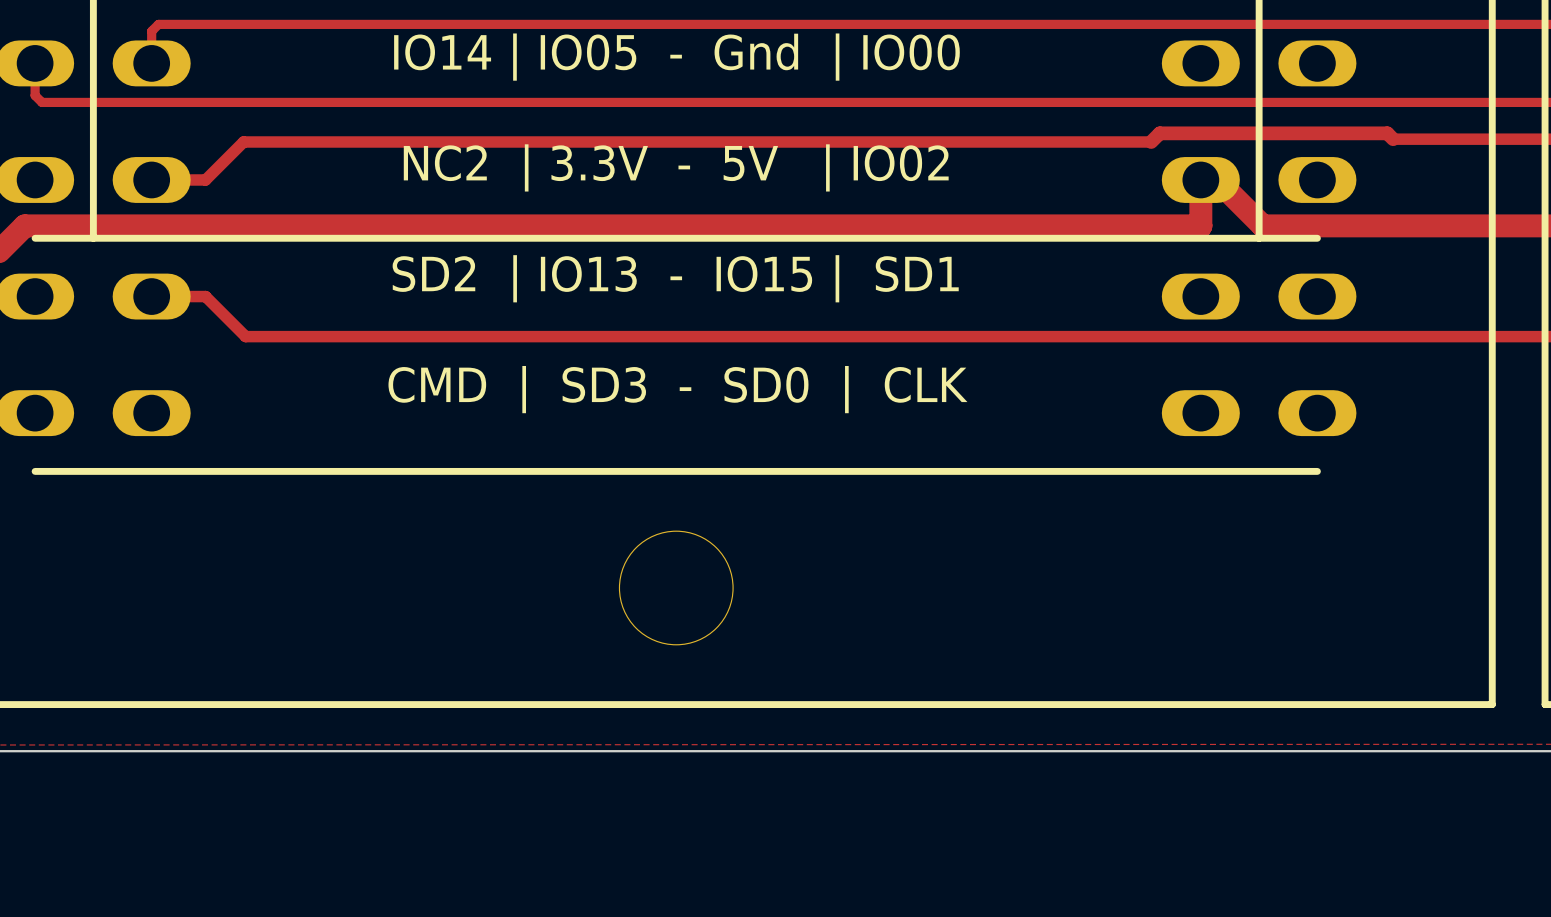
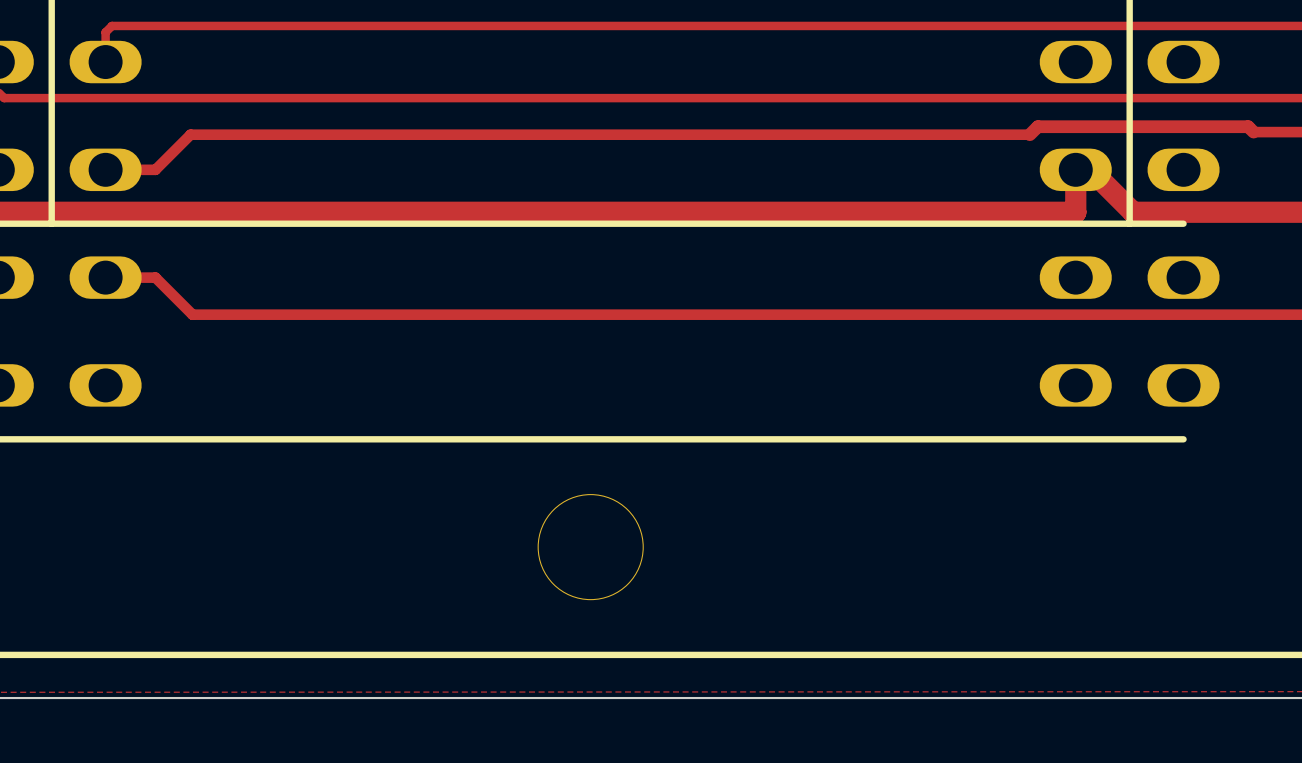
text: IO14 | IO05 - Gnd | IO00 (676, 57) -> none
text: NC2 | 3.3V - 5V | IO02 (676, 167) -> none
text: SD2 | IO13 - IO15 | SD1 (675, 278) -> none
text: CMD | SD3 - SD0 | CLK (677, 389) -> none

